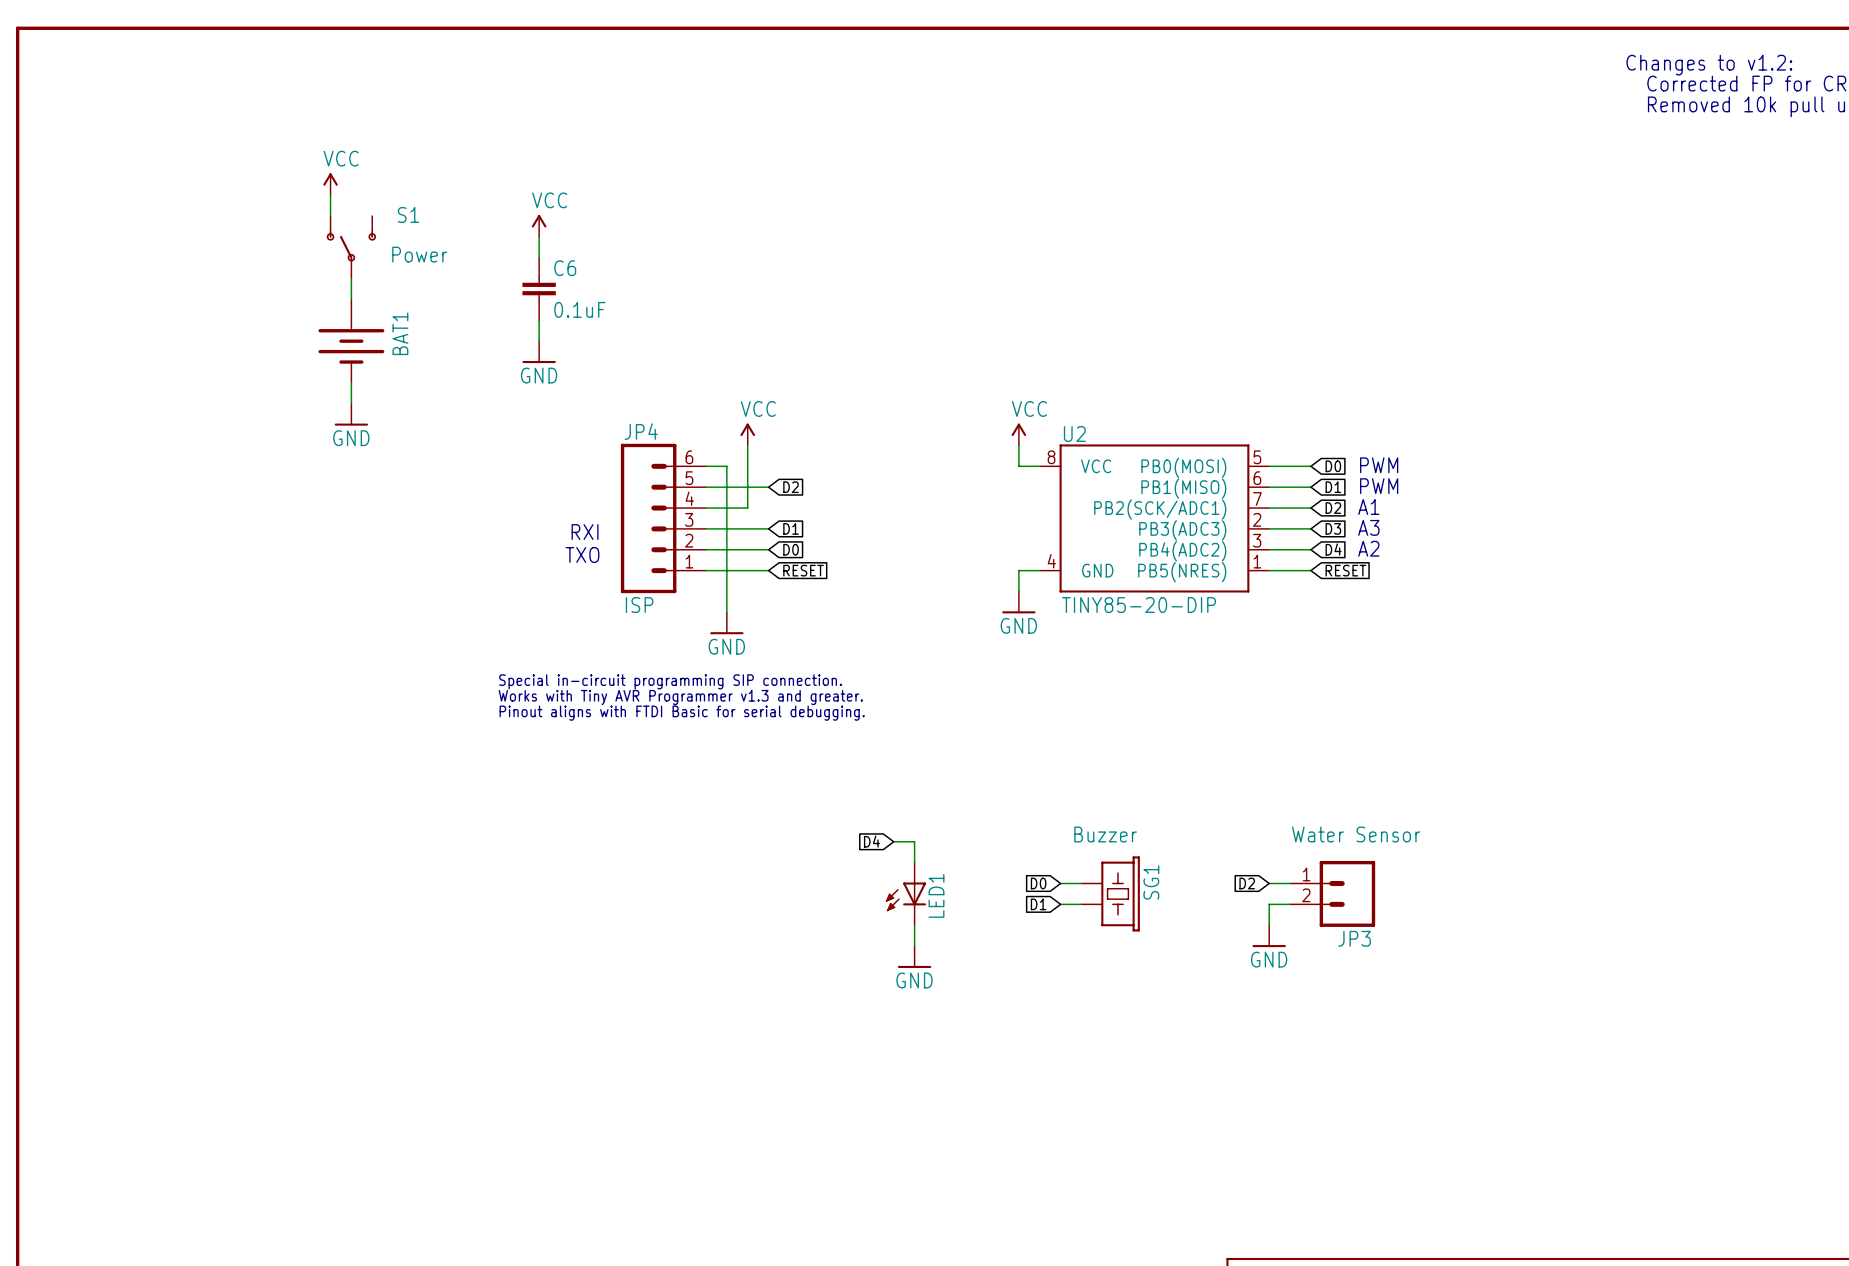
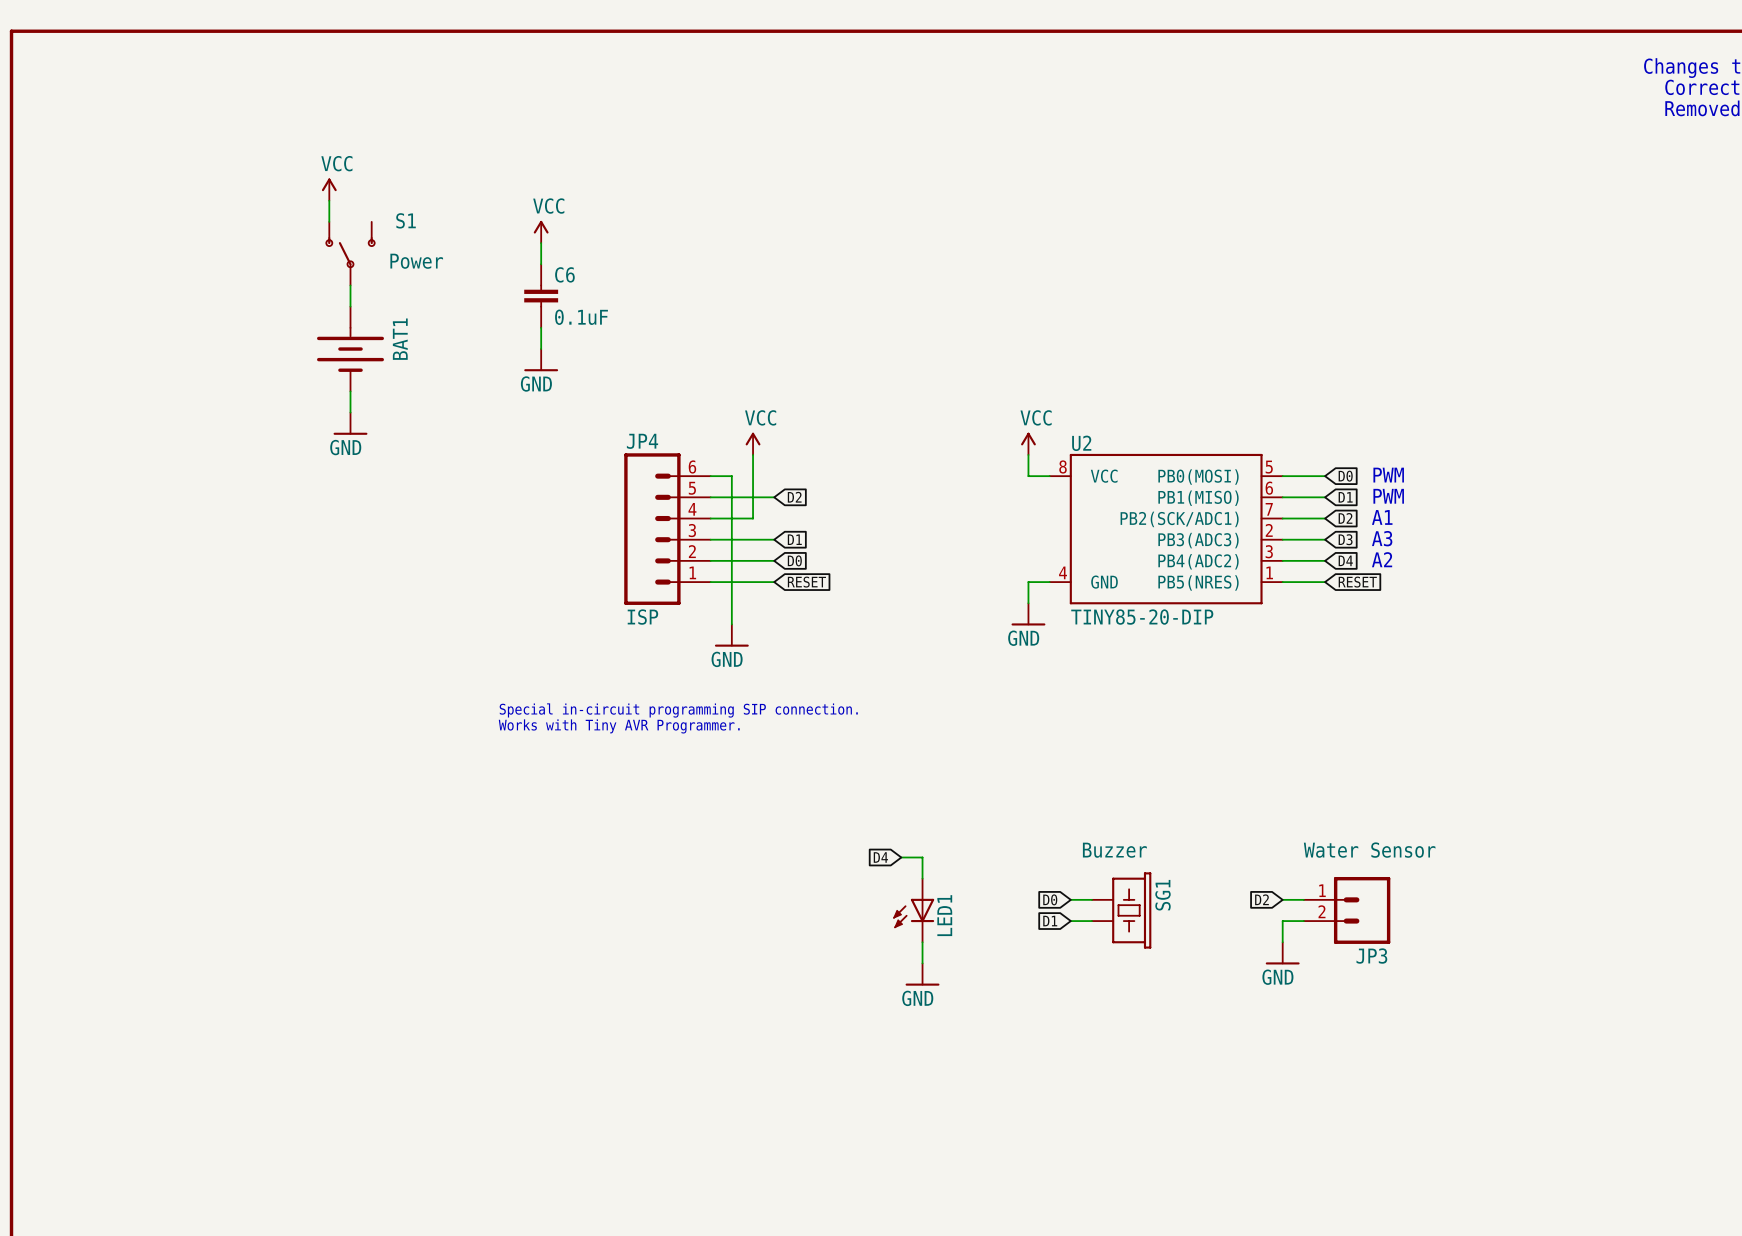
text: RXI (585, 532) -> none
text: TXO (582, 554) -> none
text: Special in-circuit programming SIP connection. (670, 681) -> none
text: Works with Tiny AVR Programmer v1.3 and greater. (680, 697) -> Special in-circuit programming SIP connection. (678, 710)
text: Pinout aligns with FTDI Basic for serial debugging. (682, 713) -> Works with Tiny AVR Programmer. (619, 726)

